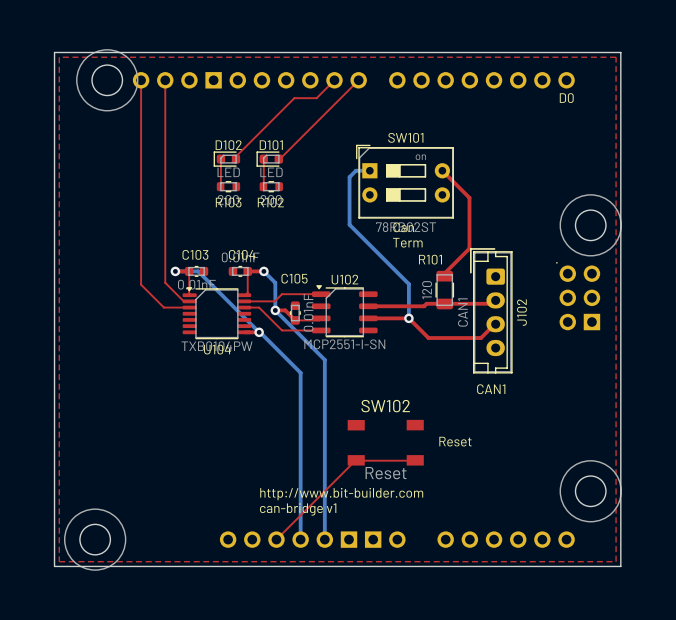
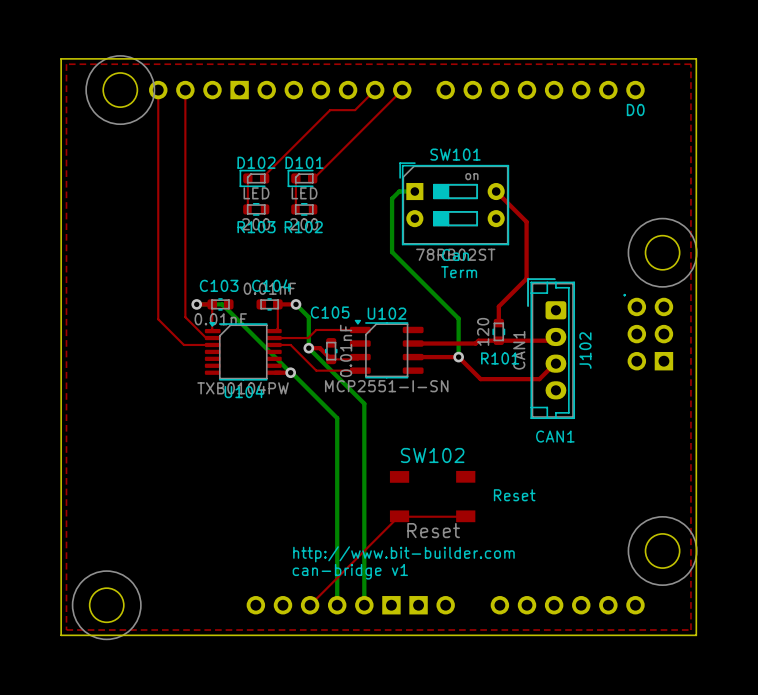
R101 name position: R101 (430, 259) -> R101 (500, 358)
R101 footprint: [435, 270, 454, 310] -> [492, 318, 506, 345]
top track: none -> (498, 306) (498, 323)

